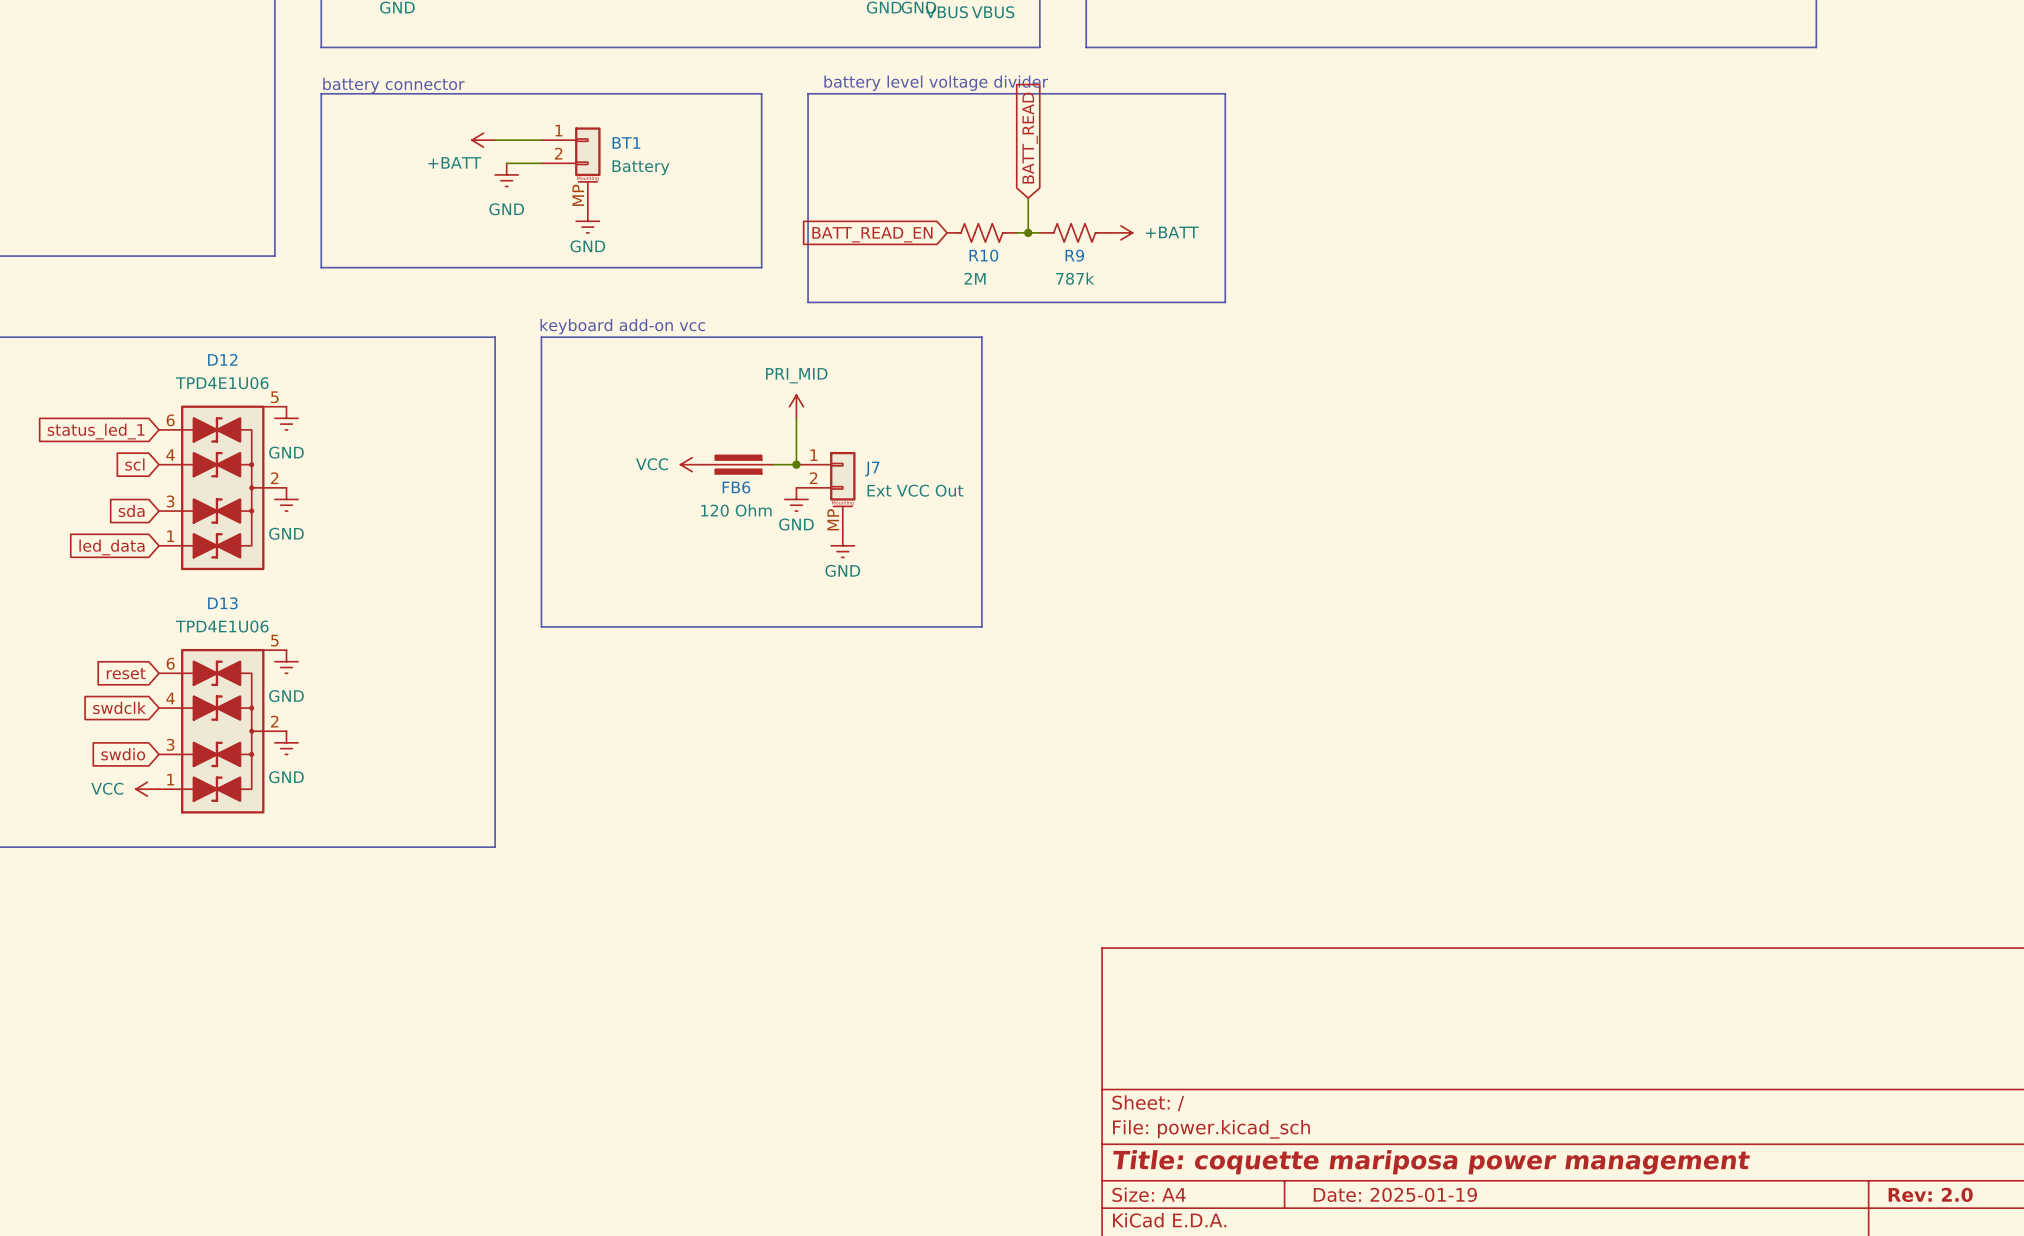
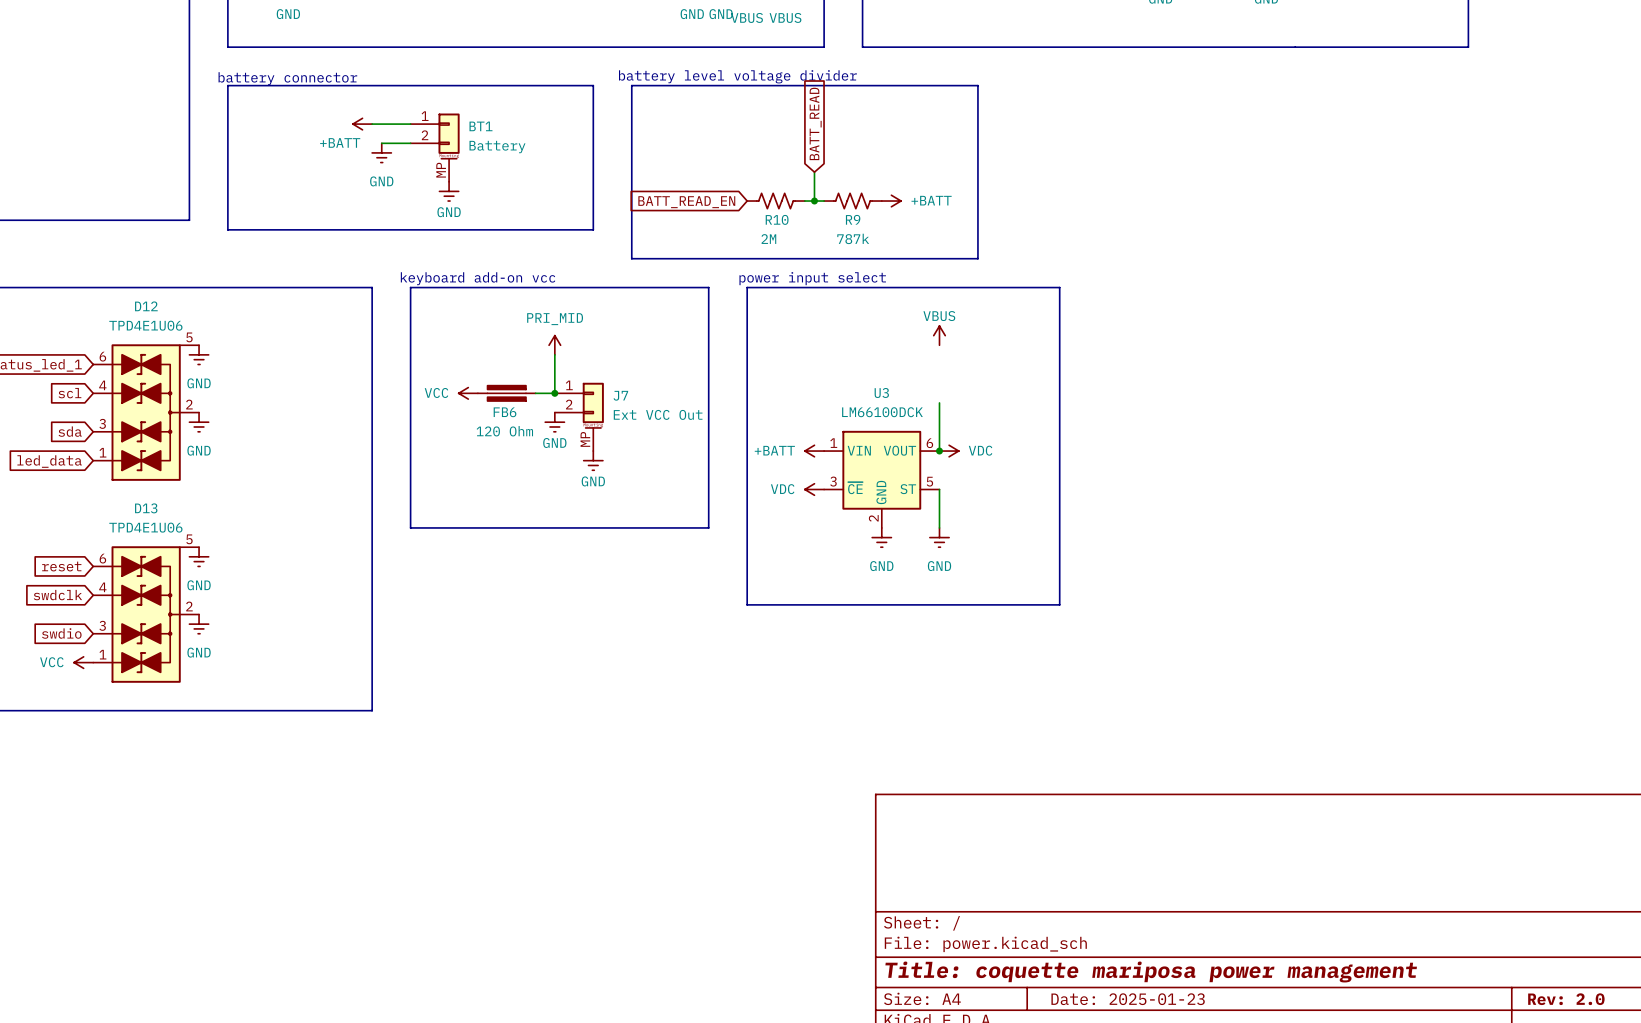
text: none -> power input select (812, 278)
line: (900, 337) (947, 337) -> (776, 287) (1059, 287) (1059, 604) (747, 604) (747, 287)
line: (981, 337) (981, 626) (900, 626) -> (708, 287) (708, 527)
power symbol: none -> VBUS (939, 335)
power symbol position: PRI_MID (796, 406) -> PRI_MID (554, 345)
wire: (796, 418) (796, 464) (773, 464) -> (554, 354) (554, 393) (535, 393)
power symbol position: VCC (692, 464) -> VCC (468, 393)
junction: none -> (554, 393)
FB6 position: (738, 464) -> (506, 393)
junction: (796, 464) -> none
wire: none -> (939, 402) (939, 451)
J7 position: (826, 493) -> (579, 416)
power symbol: none -> GND (554, 422)
power symbol: GND (796, 499) -> none
power symbol: none -> +BATT (814, 451)
junction: none -> (939, 451)
power symbol: none -> VDC (949, 451)
power symbol: none -> GND (593, 460)
power symbol: GND (842, 545) -> none
U3: none -> LM66100DCK (881, 479)
power symbol: none -> VDC (814, 489)
wire: none -> (939, 489) (939, 527)
power symbol: none -> GND (881, 537)
power symbol: none -> GND (939, 537)
title block: Date: 2025-01-19 (1395, 1194) -> Date: 2025-01-23 (1128, 999)

